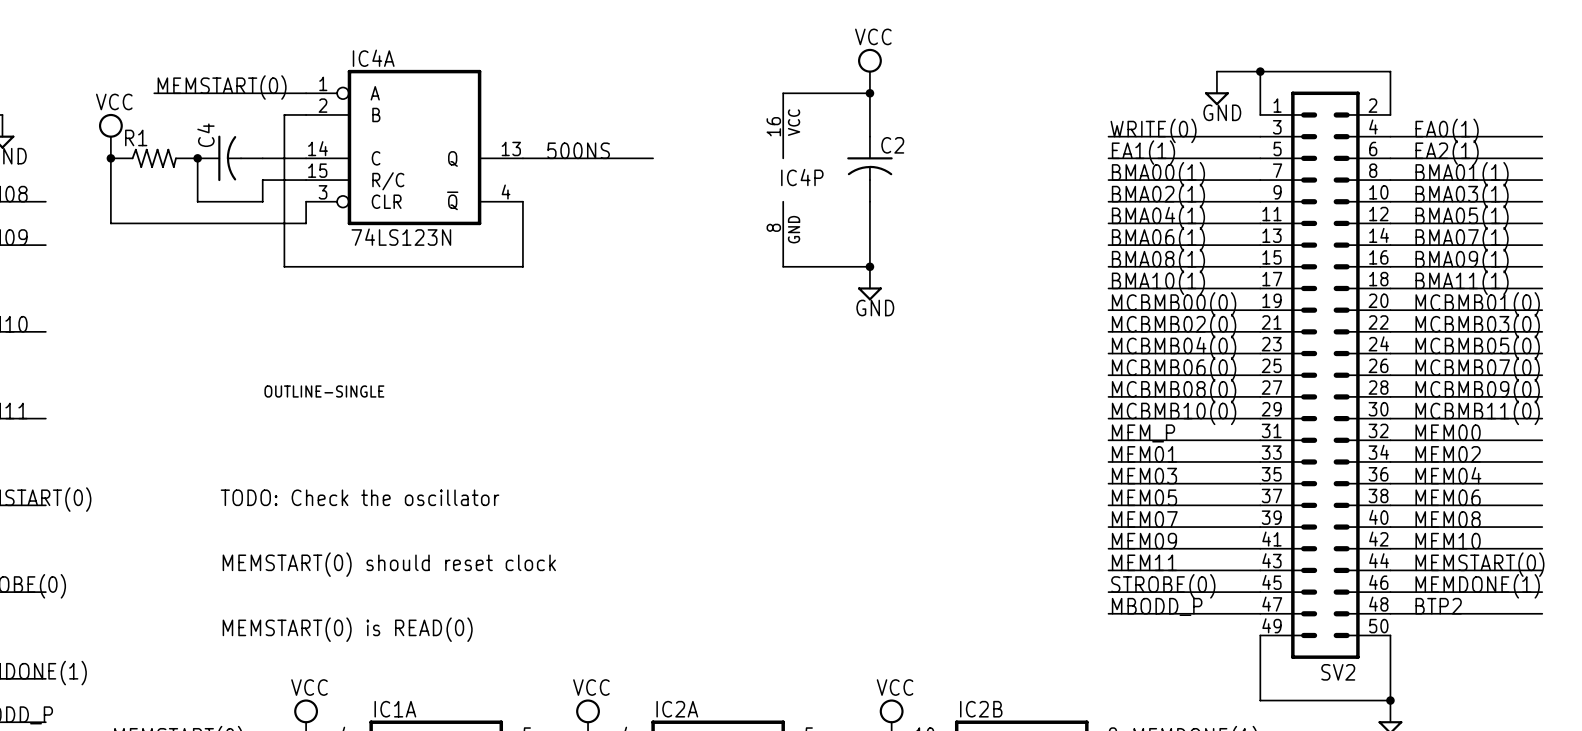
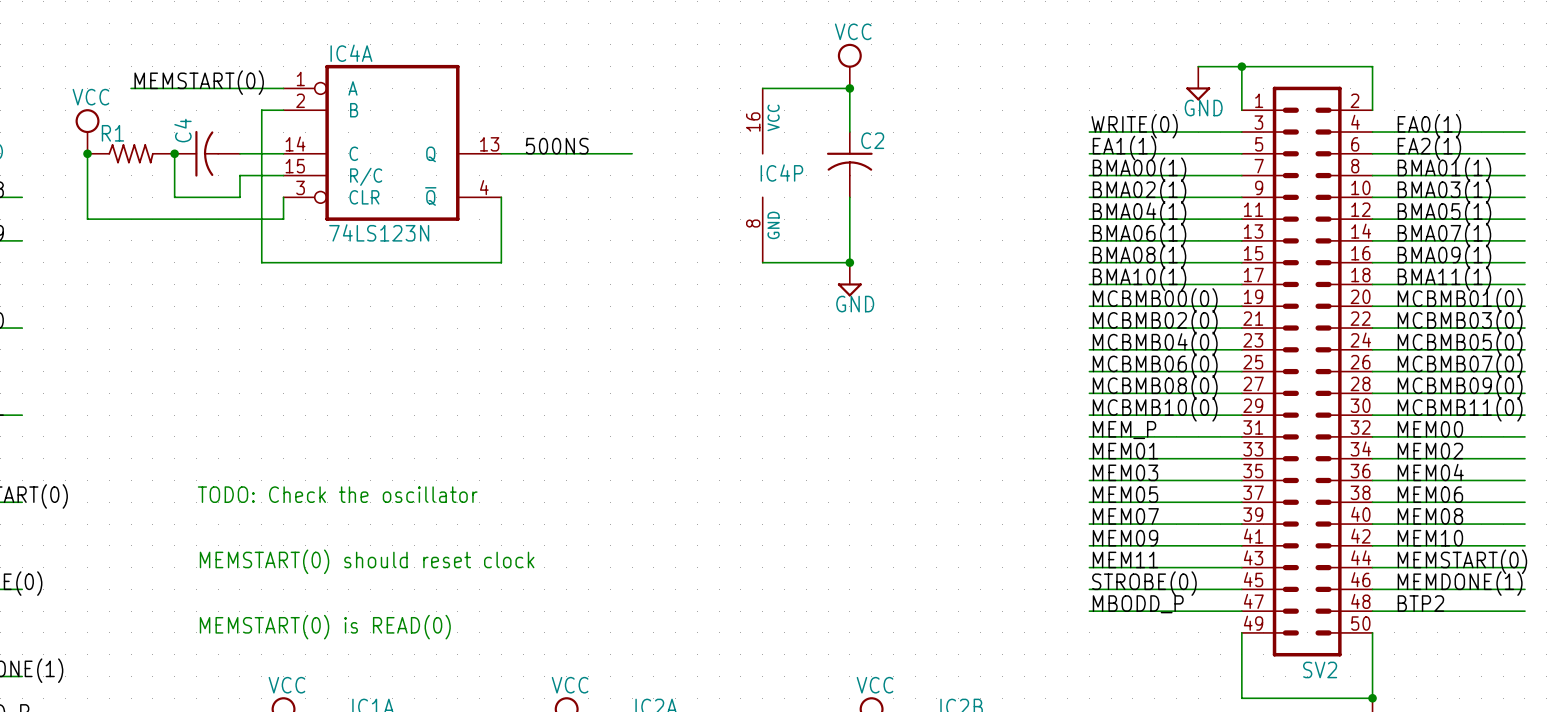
part: OUTLINE-SINGLE (324, 391) -> none

